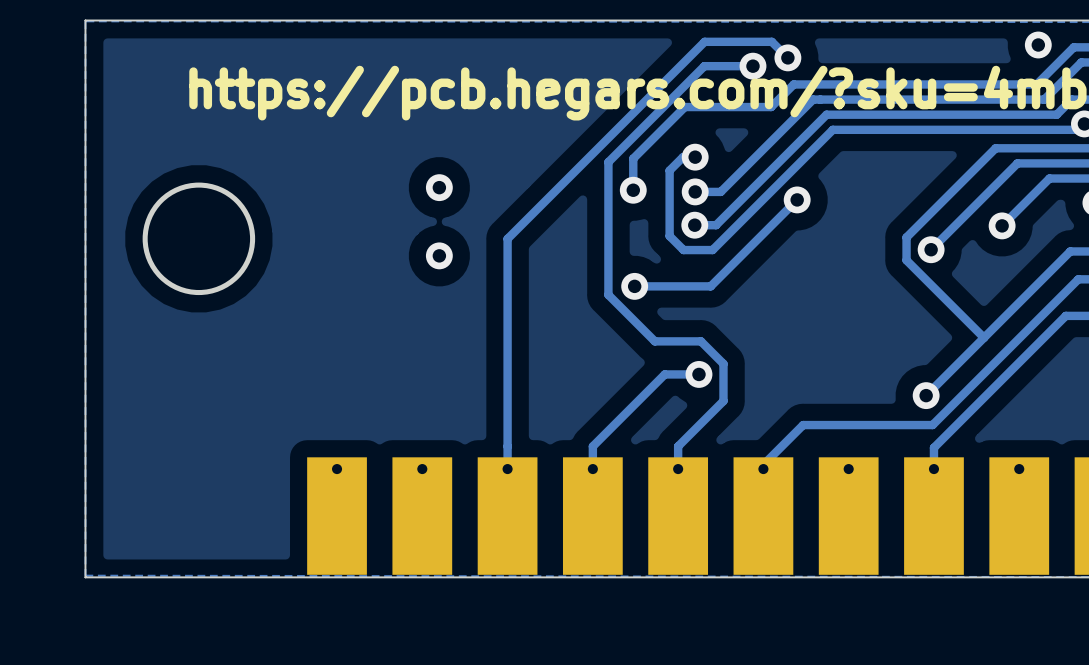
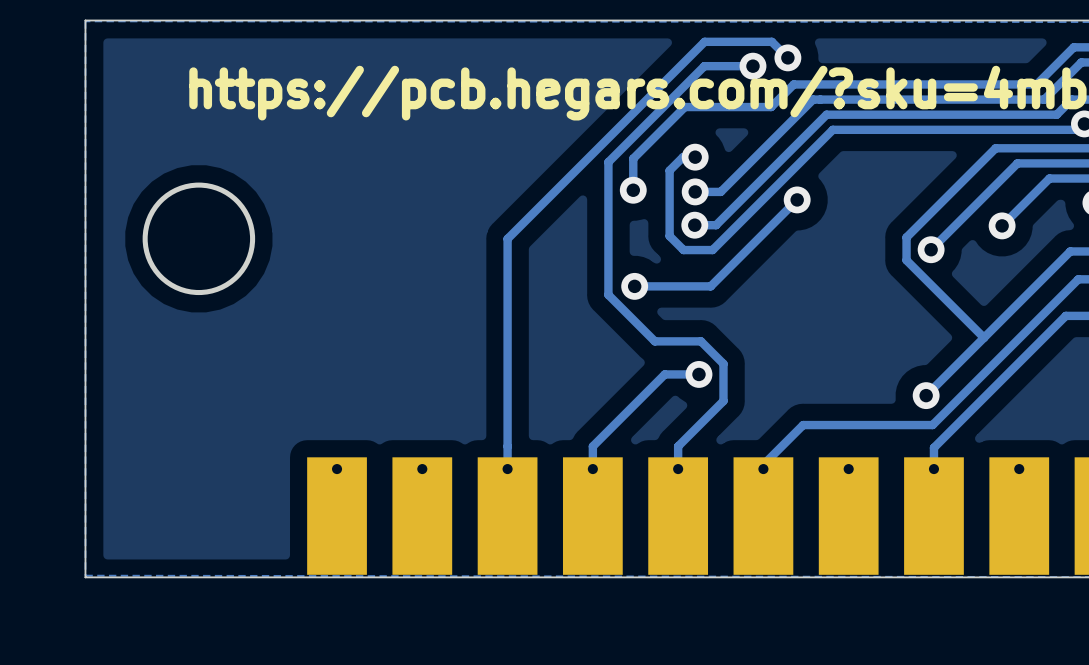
via: (1038, 44) -> none
via: (439, 187) -> none
via: (439, 255) -> none

